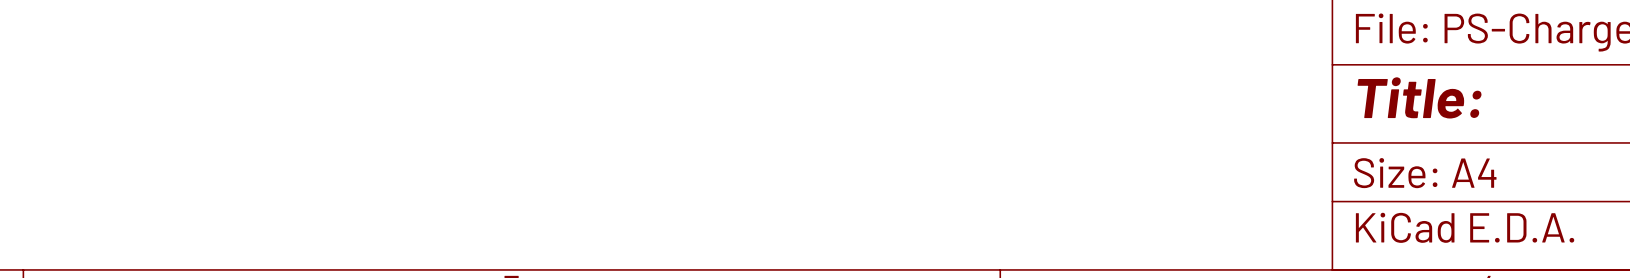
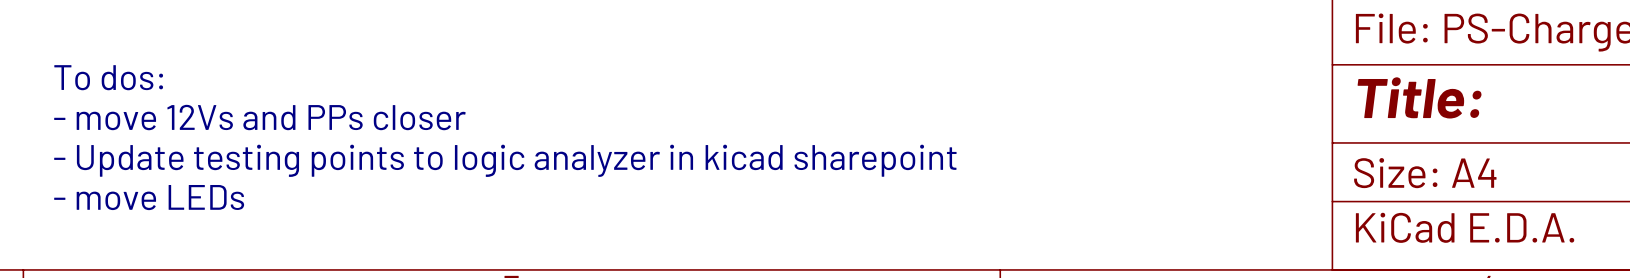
text: none -> To dos: (108, 77)
text: none -> - move 12Vs and PPs closer (259, 117)
text: none -> - Update testing points to logic analyzer in kicad sharepoint (505, 160)
text: none -> - move LEDs (149, 197)

